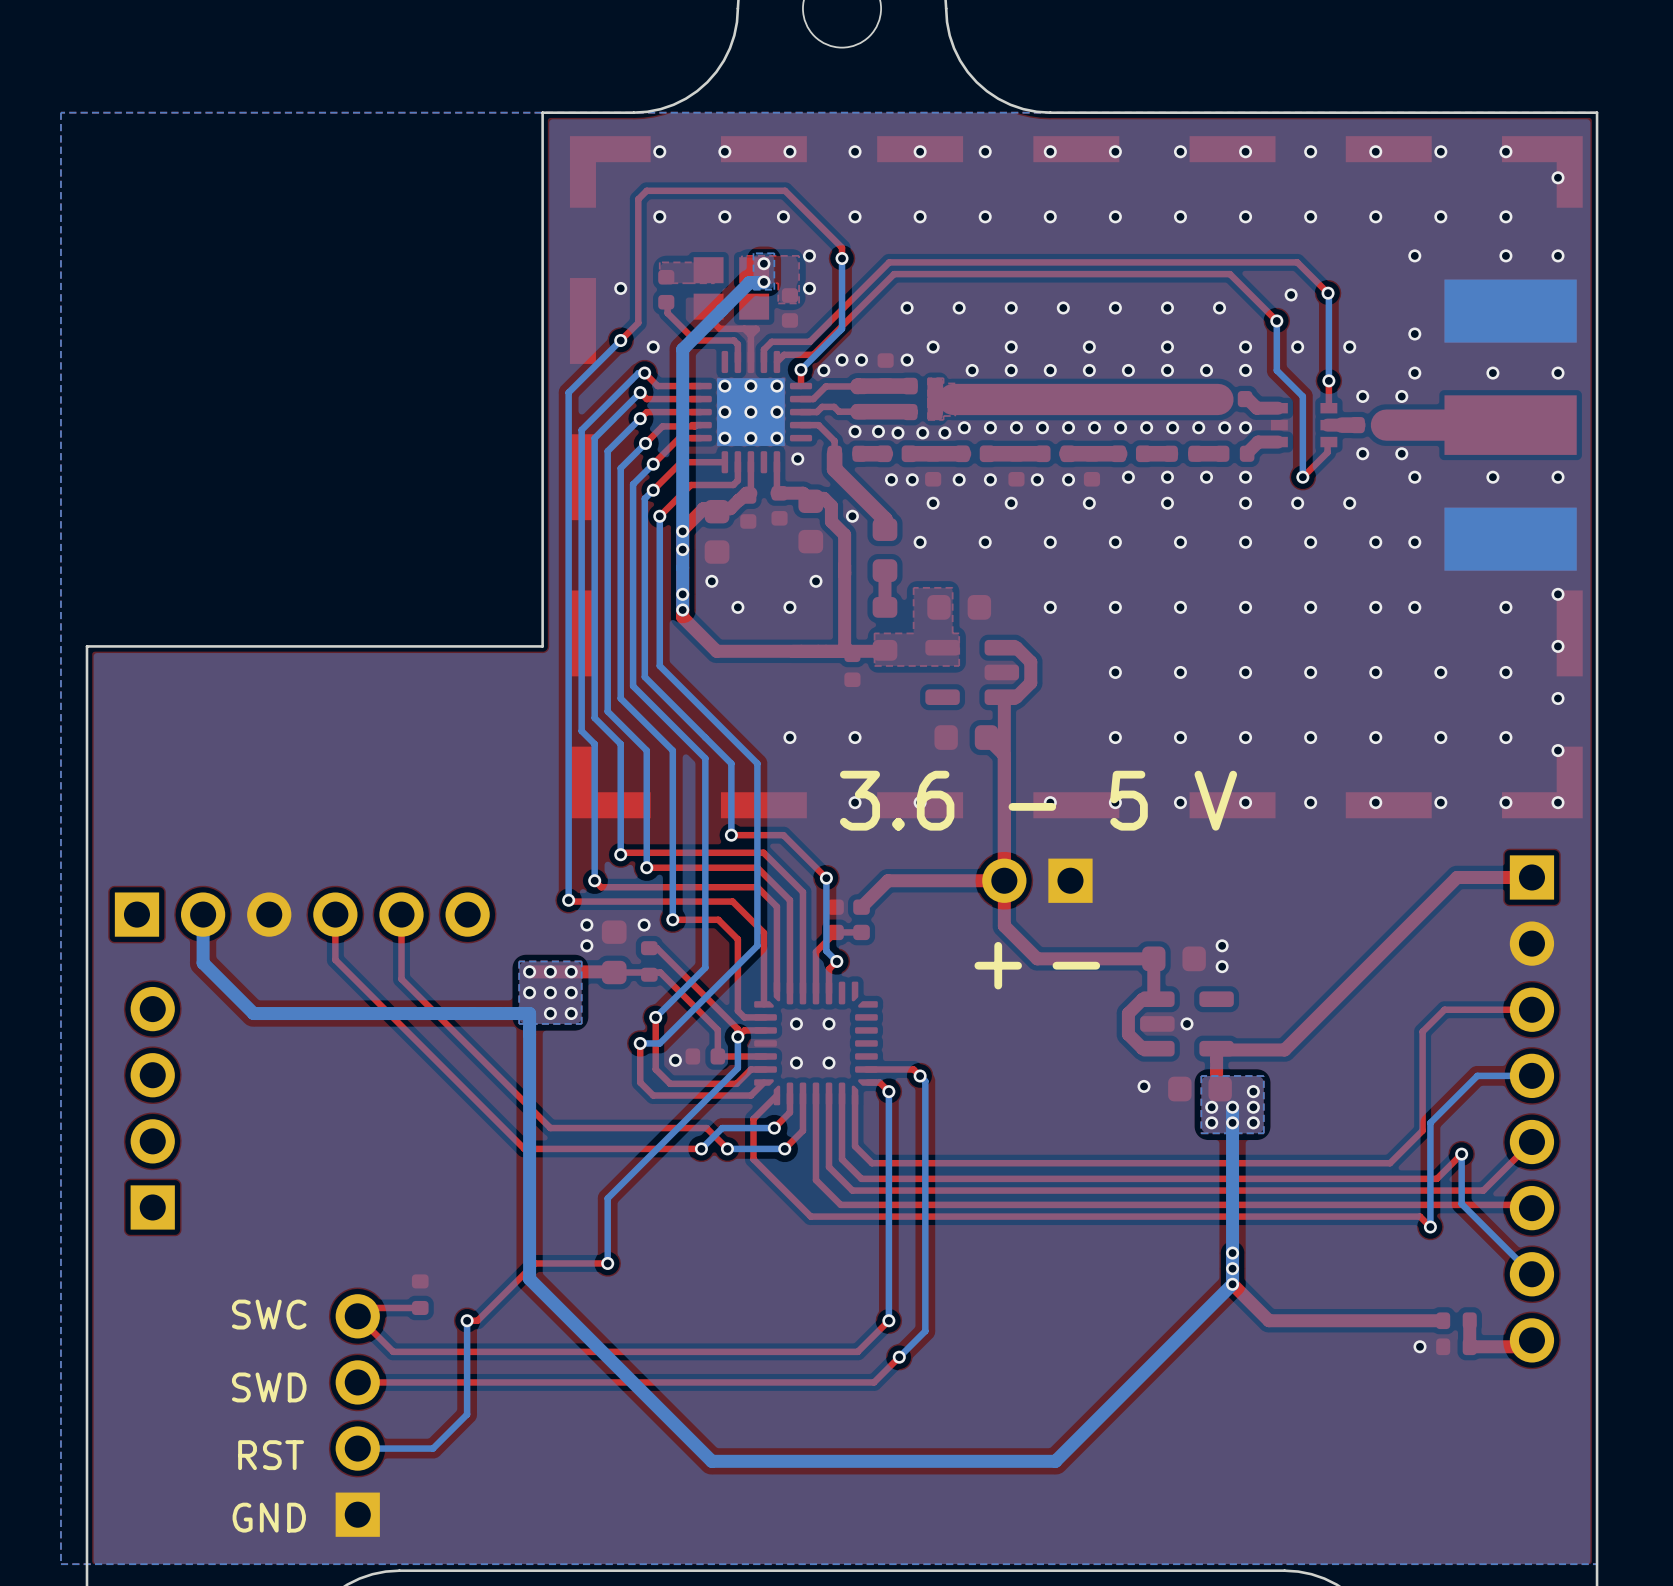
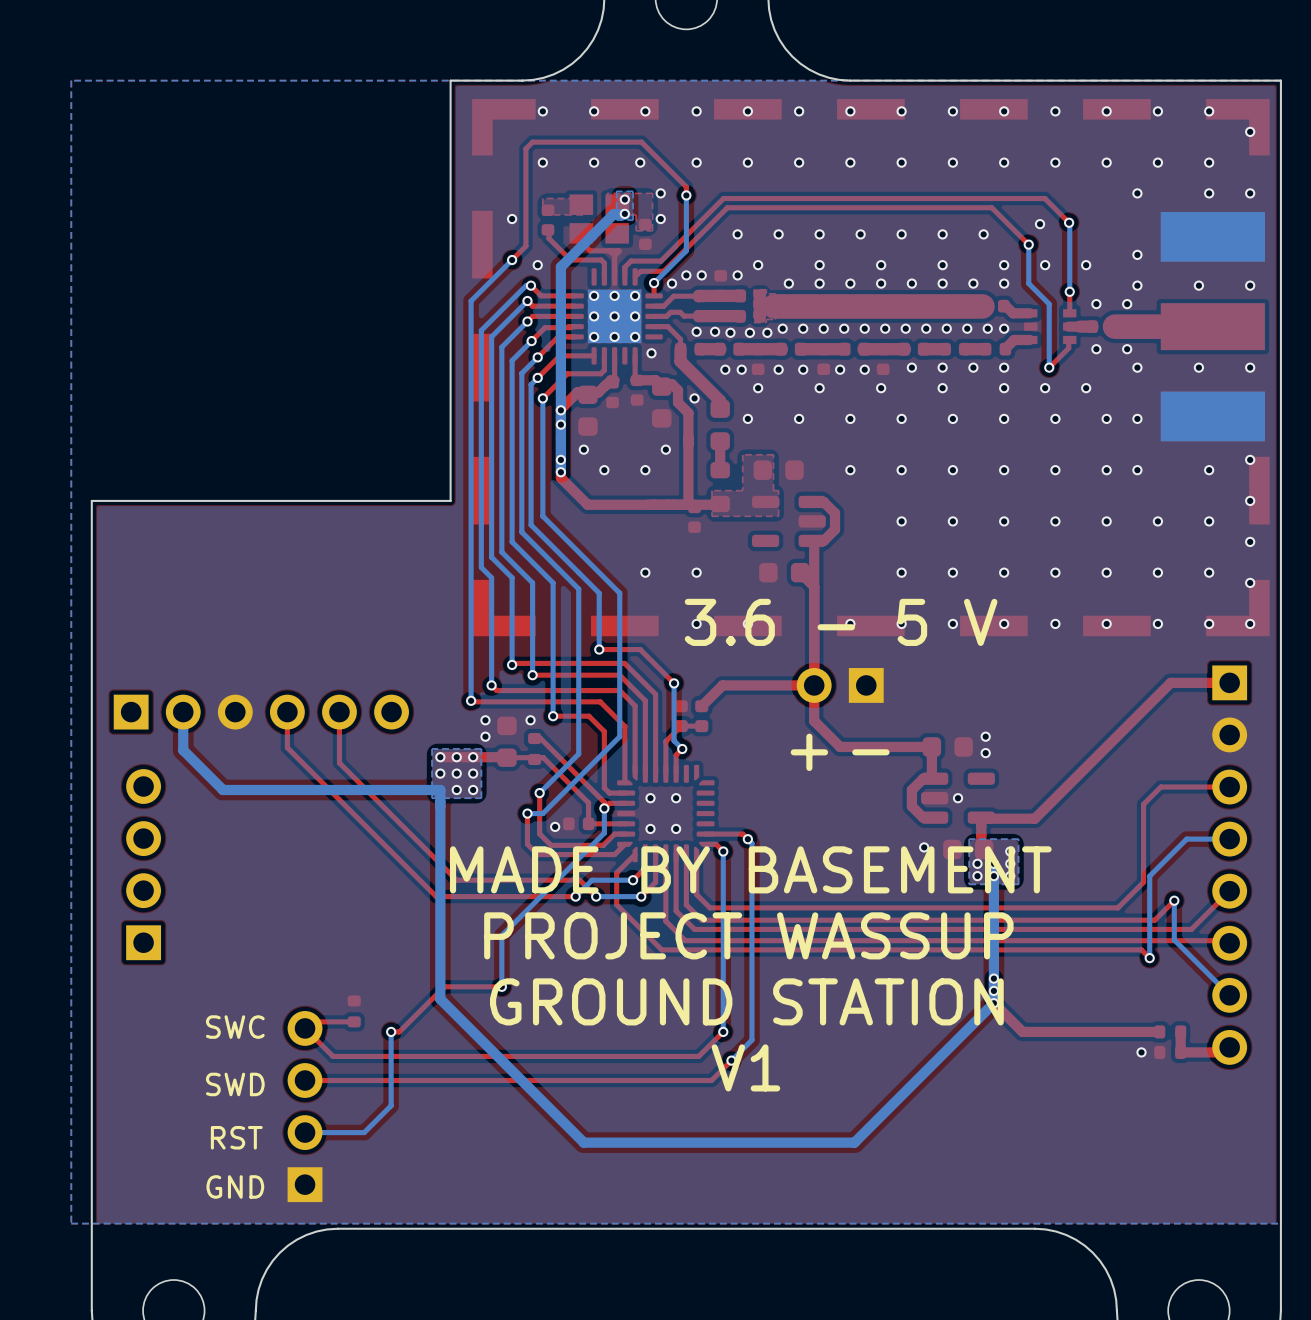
text: none -> MADE BY BASEMENT (750, 869)
text: none -> PROJECT WASSUP (748, 935)
text: none -> GROUND STATION (746, 1001)
text: none -> V1 (745, 1067)

